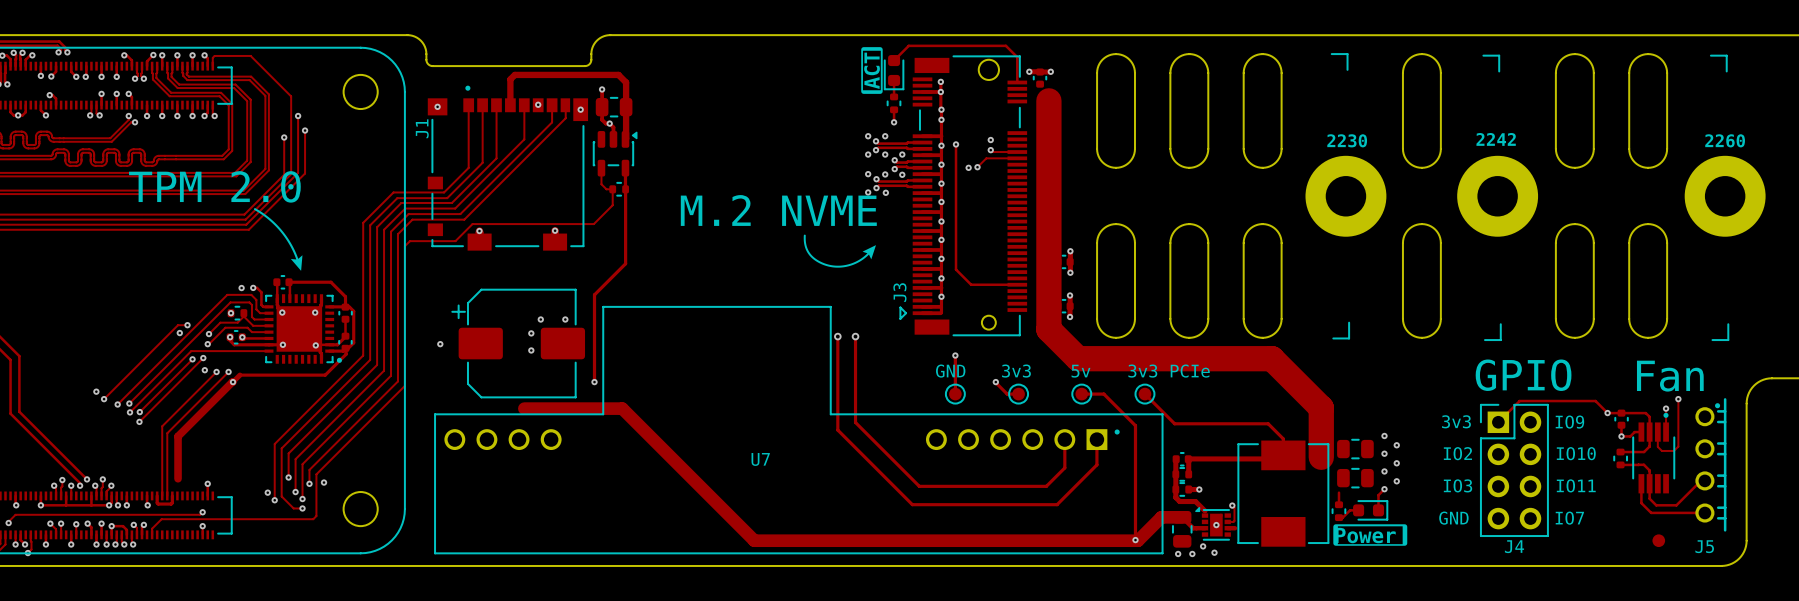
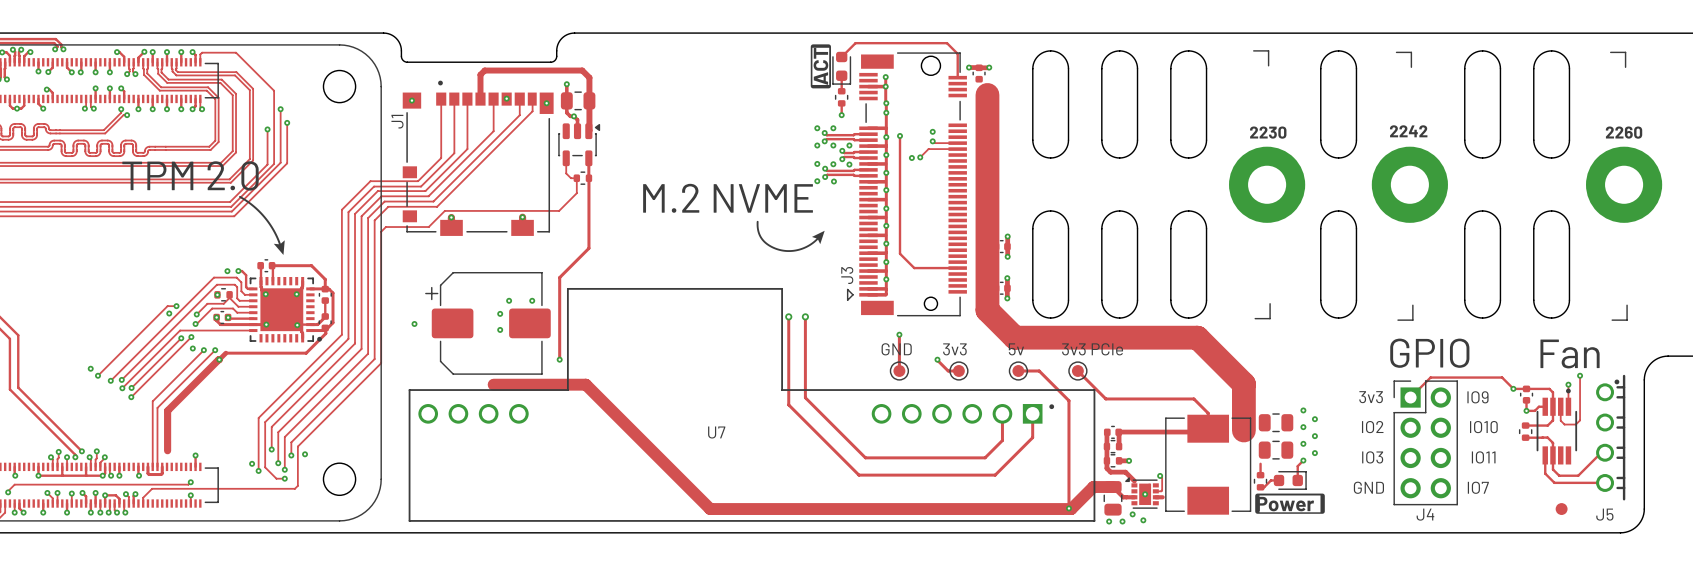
track: (30, 534) (31, 549) (27, 553) -> none
via: (27, 553) -> none

